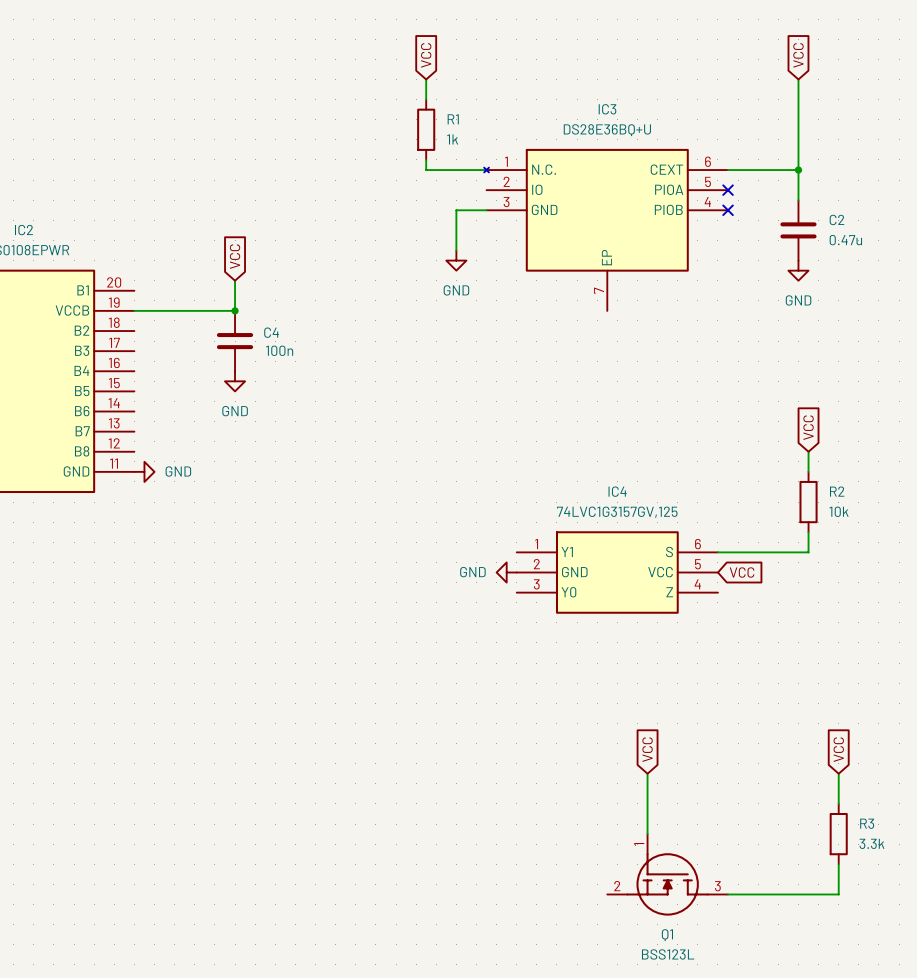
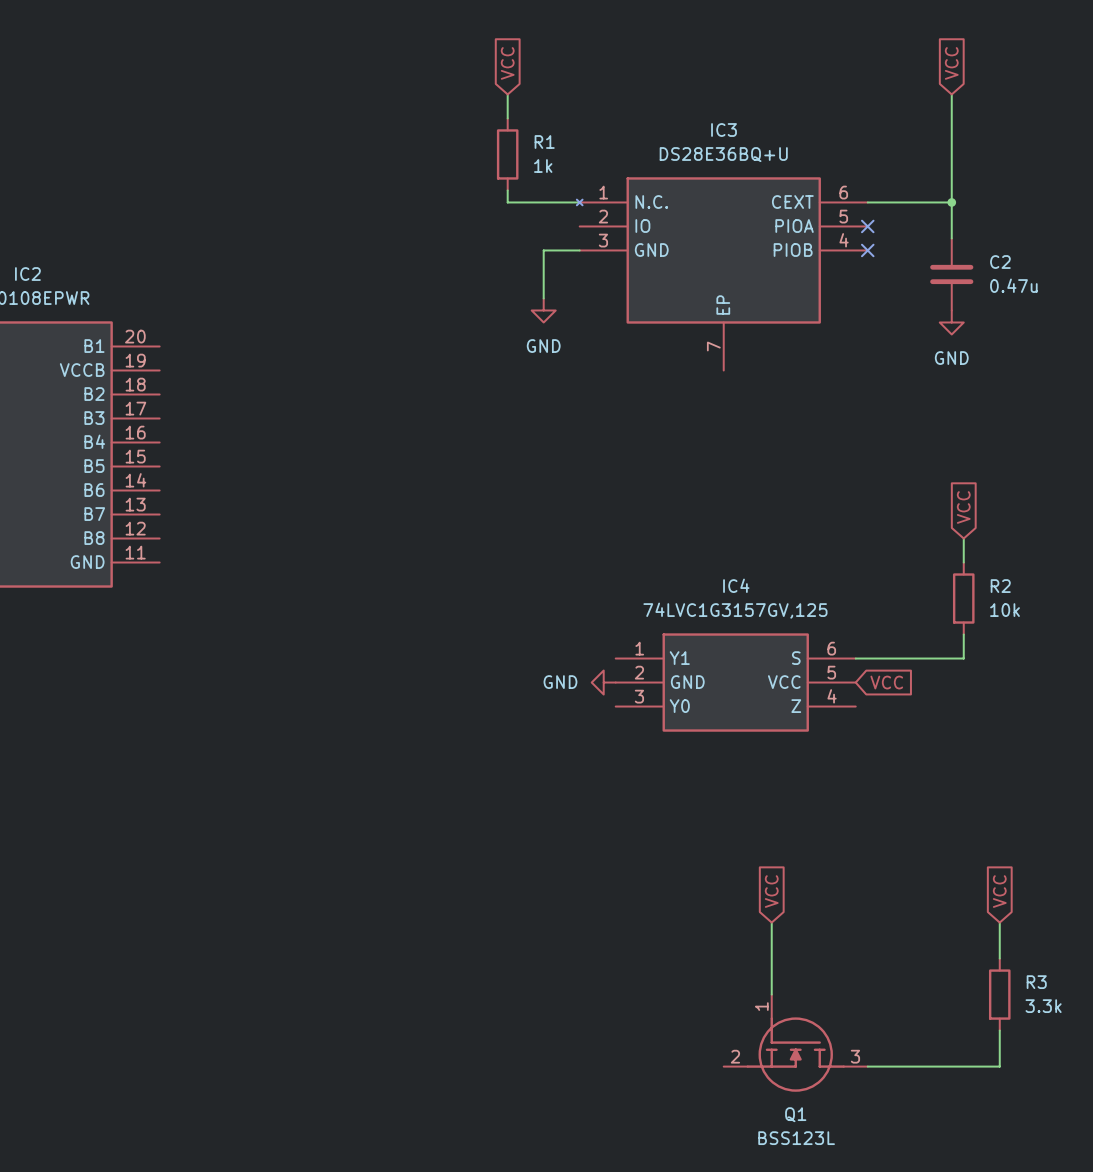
global label: VCC (235, 256) -> none
wire: (235, 280) (235, 310) (134, 310) -> none
junction: (235, 310) -> none
C4: 100n (235, 341) -> none
power symbol: GND (235, 381) -> none
power symbol: GND (144, 471) -> none

